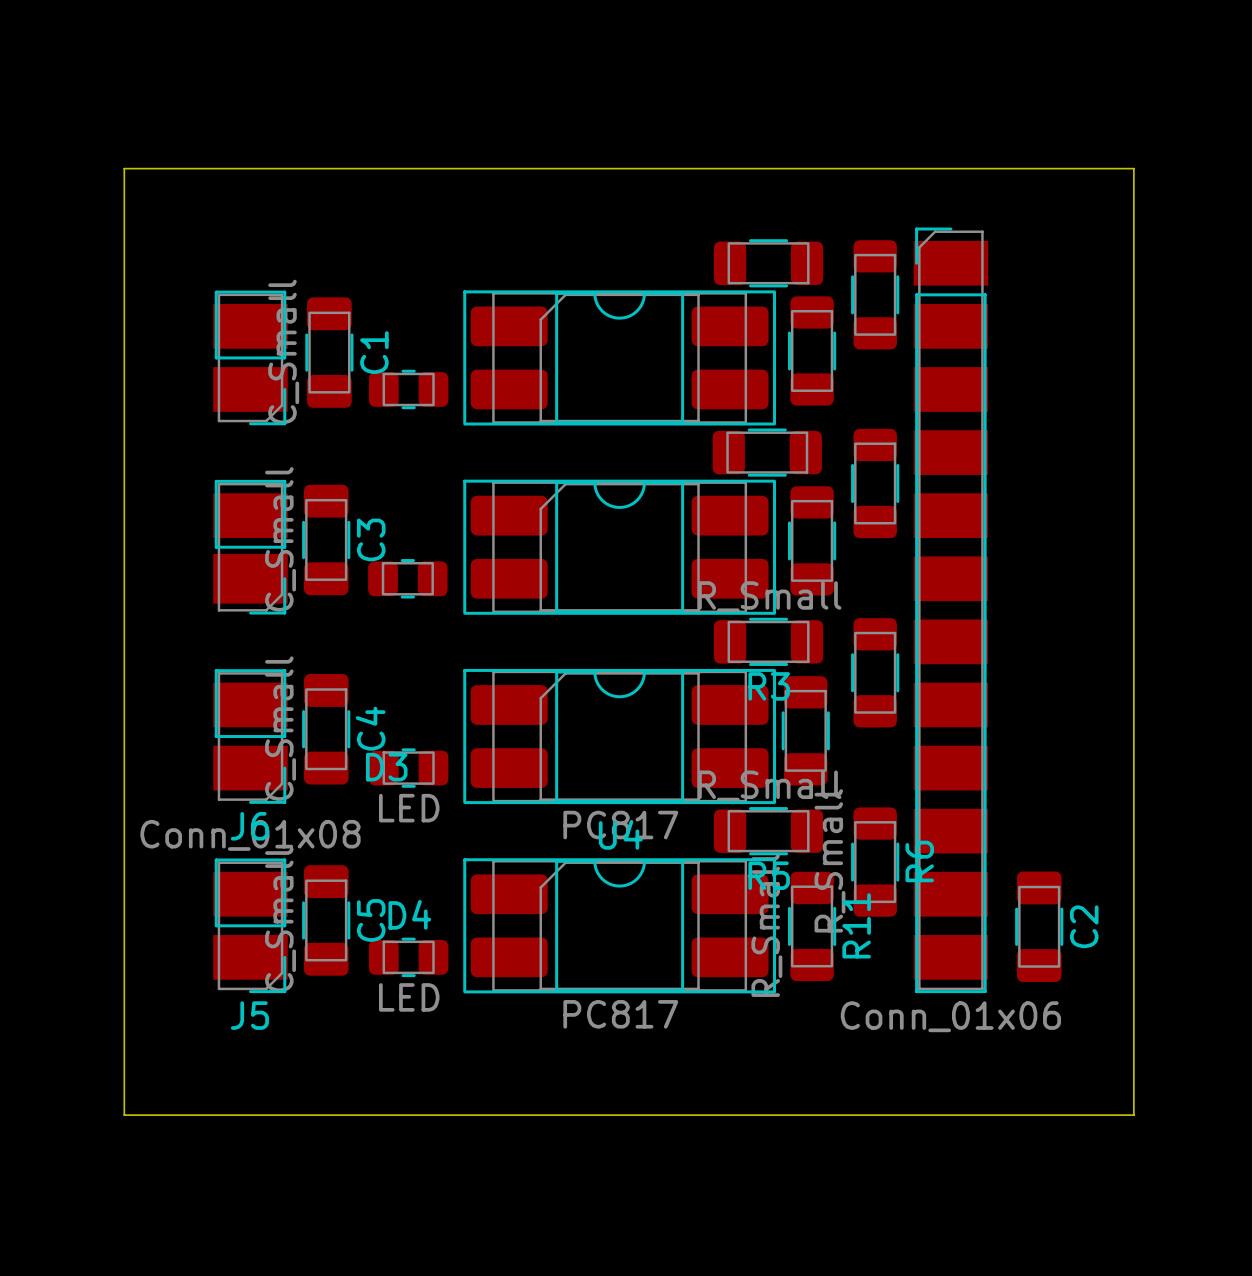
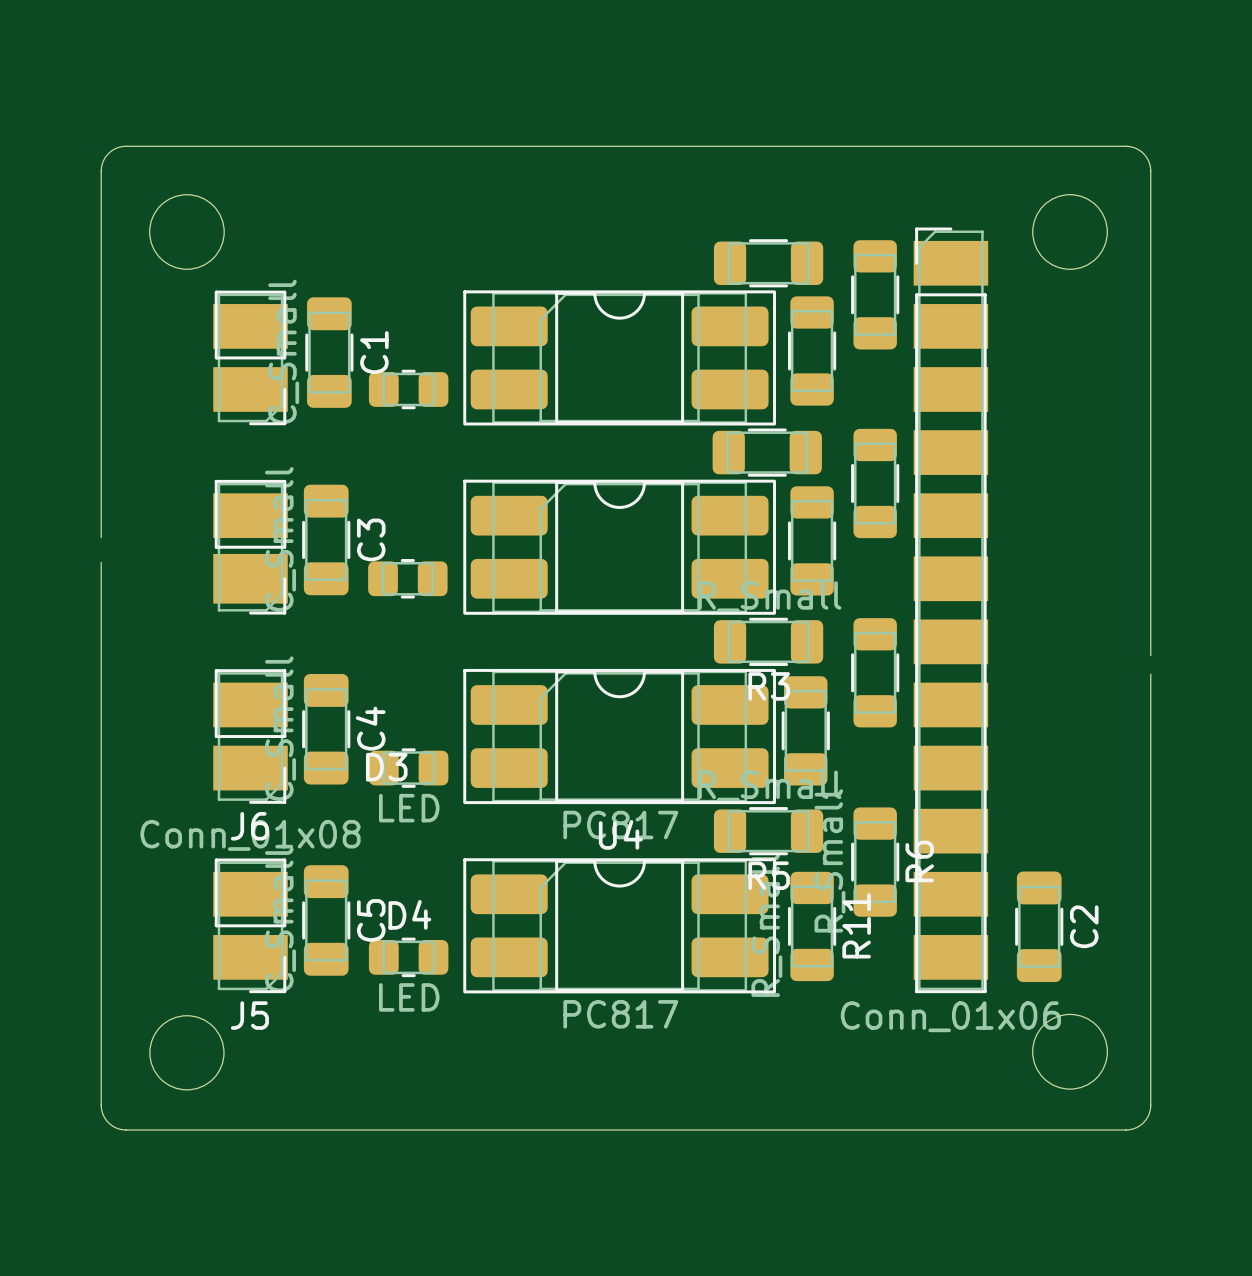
board edge: (124, 168) (1133, 168) (1133, 1115) (124, 1115) (124, 168) -> none
round board edge: none -> [149, 194, 225, 270]
round board edge: none -> [1032, 194, 1108, 270]
board edge: none -> (101, 537) (101, 171) (106, 155) (117, 147) (1128, 146) (1143, 153) (1148, 160) (1150, 171) (1150, 655)
board edge: none -> (101, 562) (101, 1105) (106, 1120) (115, 1127) (123, 1129) (1125, 1130) (1136, 1127) (1146, 1118) (1150, 1105) (1150, 674)
round board edge: none -> [1032, 1013, 1109, 1090]
round board edge: none -> [149, 1015, 225, 1091]

